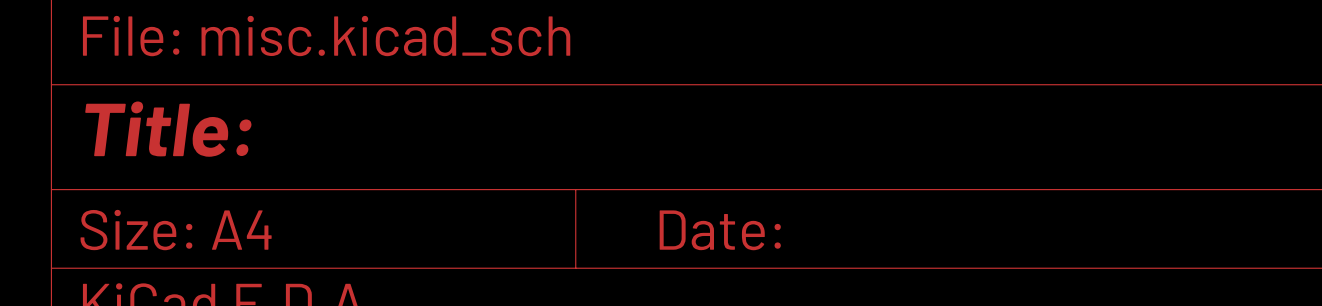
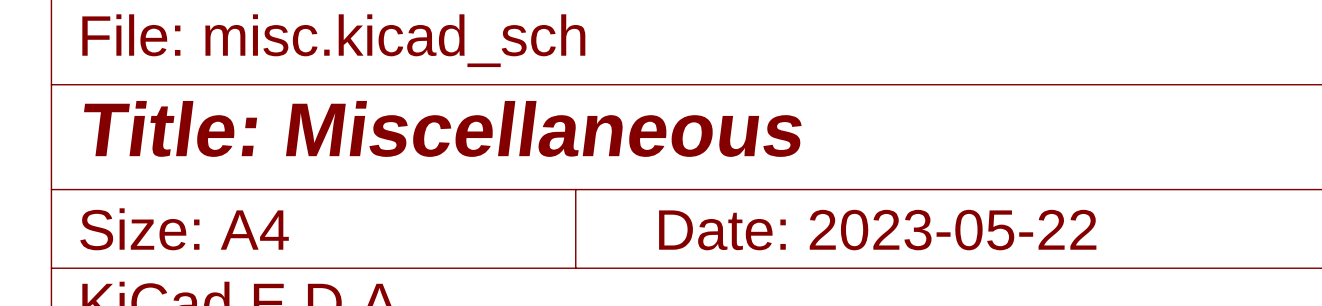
title block: Title: (168, 129) -> Title: Miscellaneous (442, 128)
title block: Date: (720, 230) -> Date: 2023-05-22 (877, 230)

